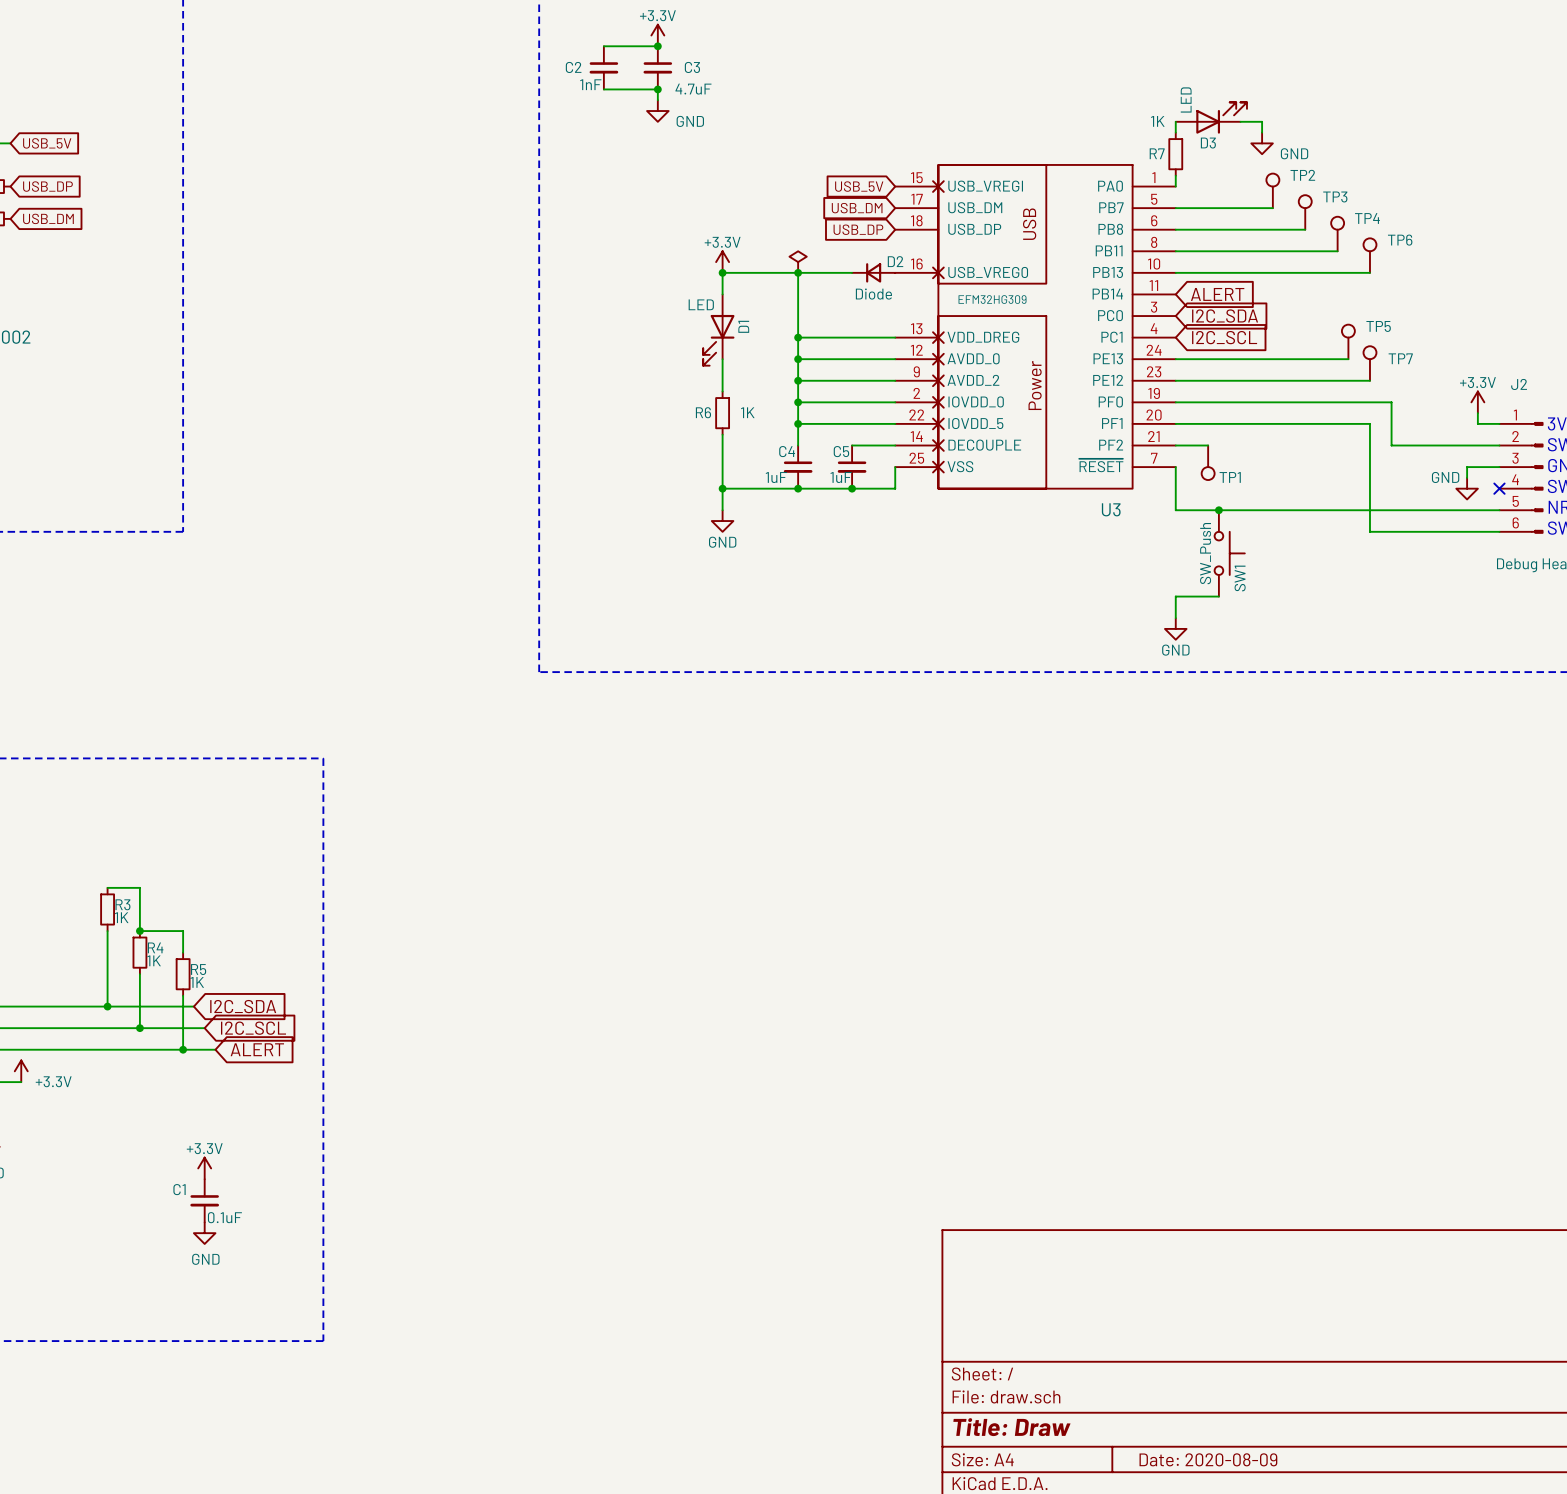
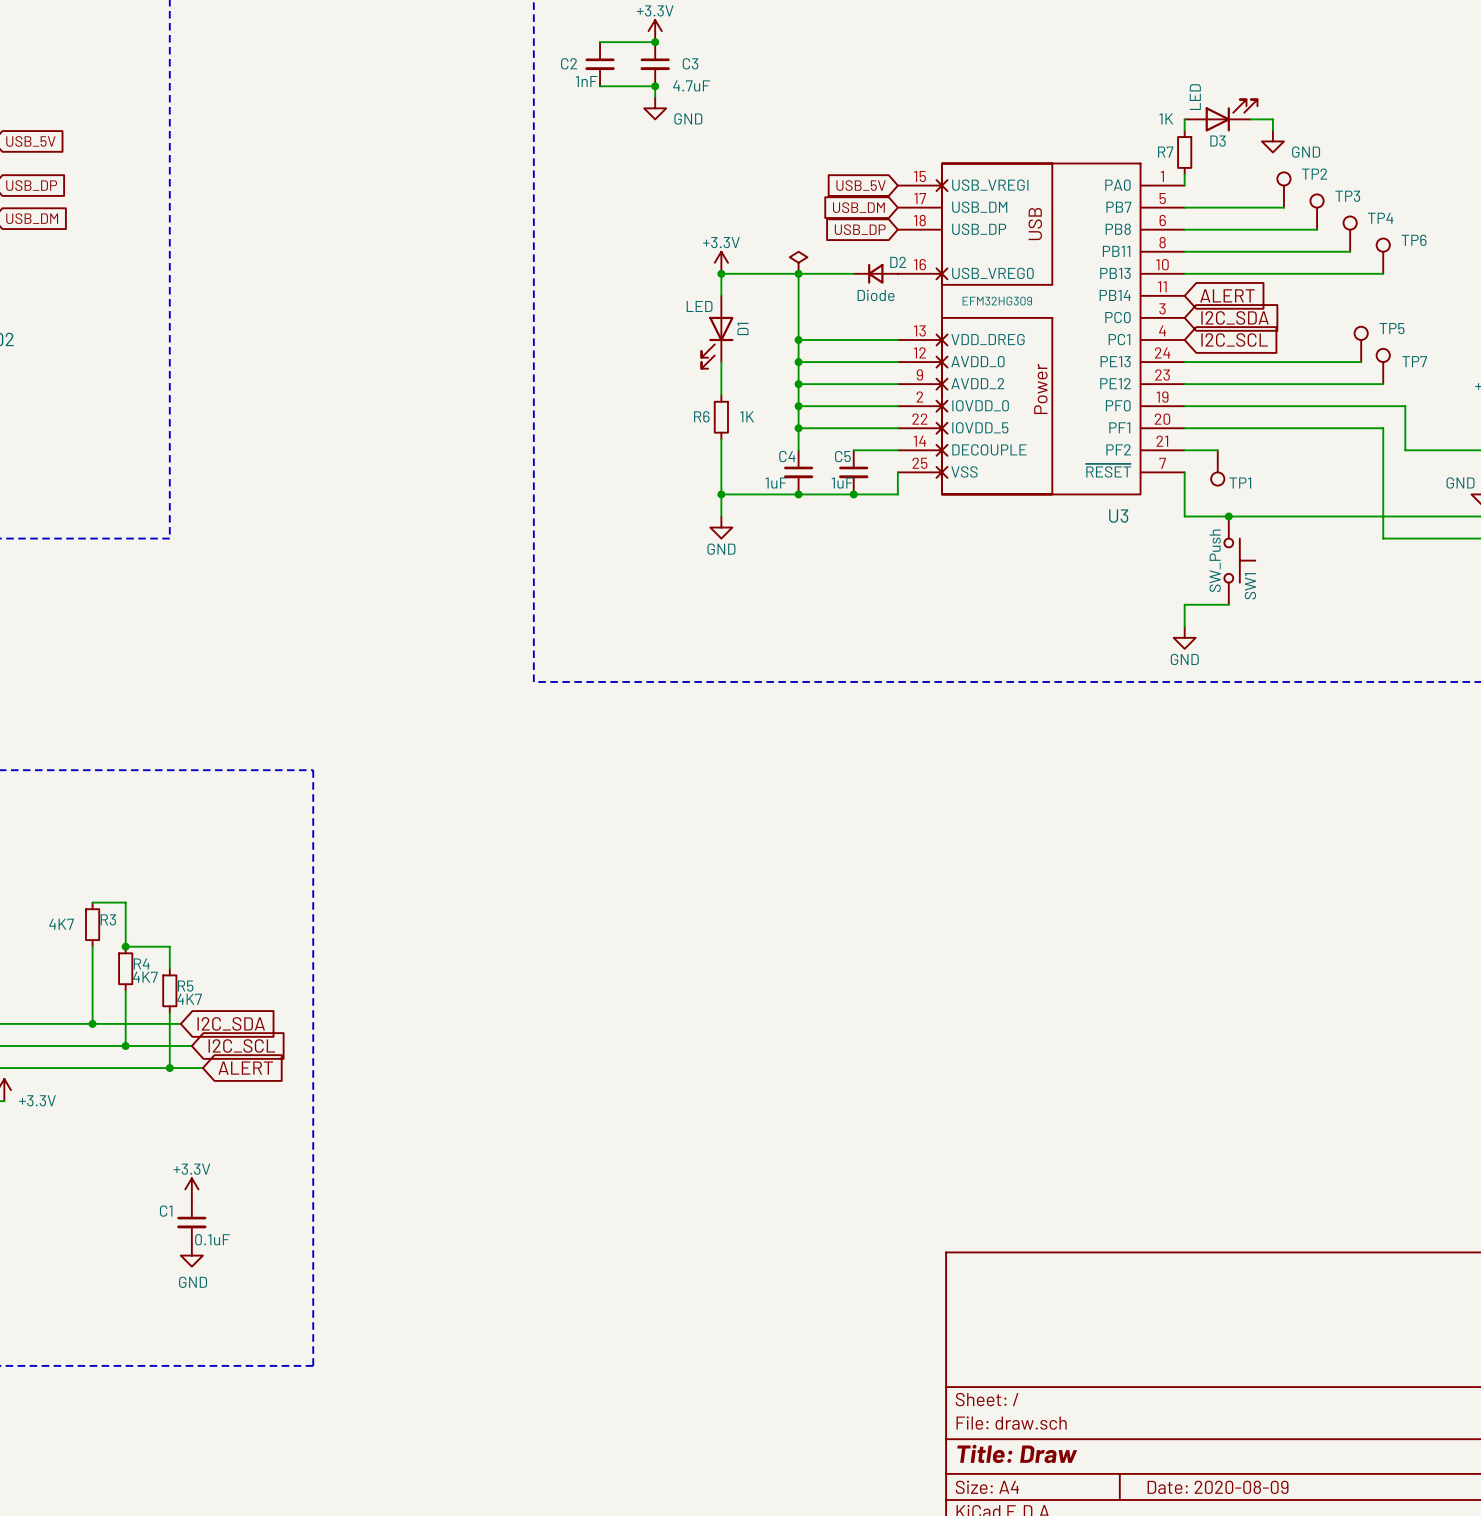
R3 value: 1K (121, 917) -> 4K7 (61, 924)
R4 value: 1K (154, 960) -> 4K7 (145, 977)
R5 value: 1K (197, 982) -> 4K7 (189, 999)

